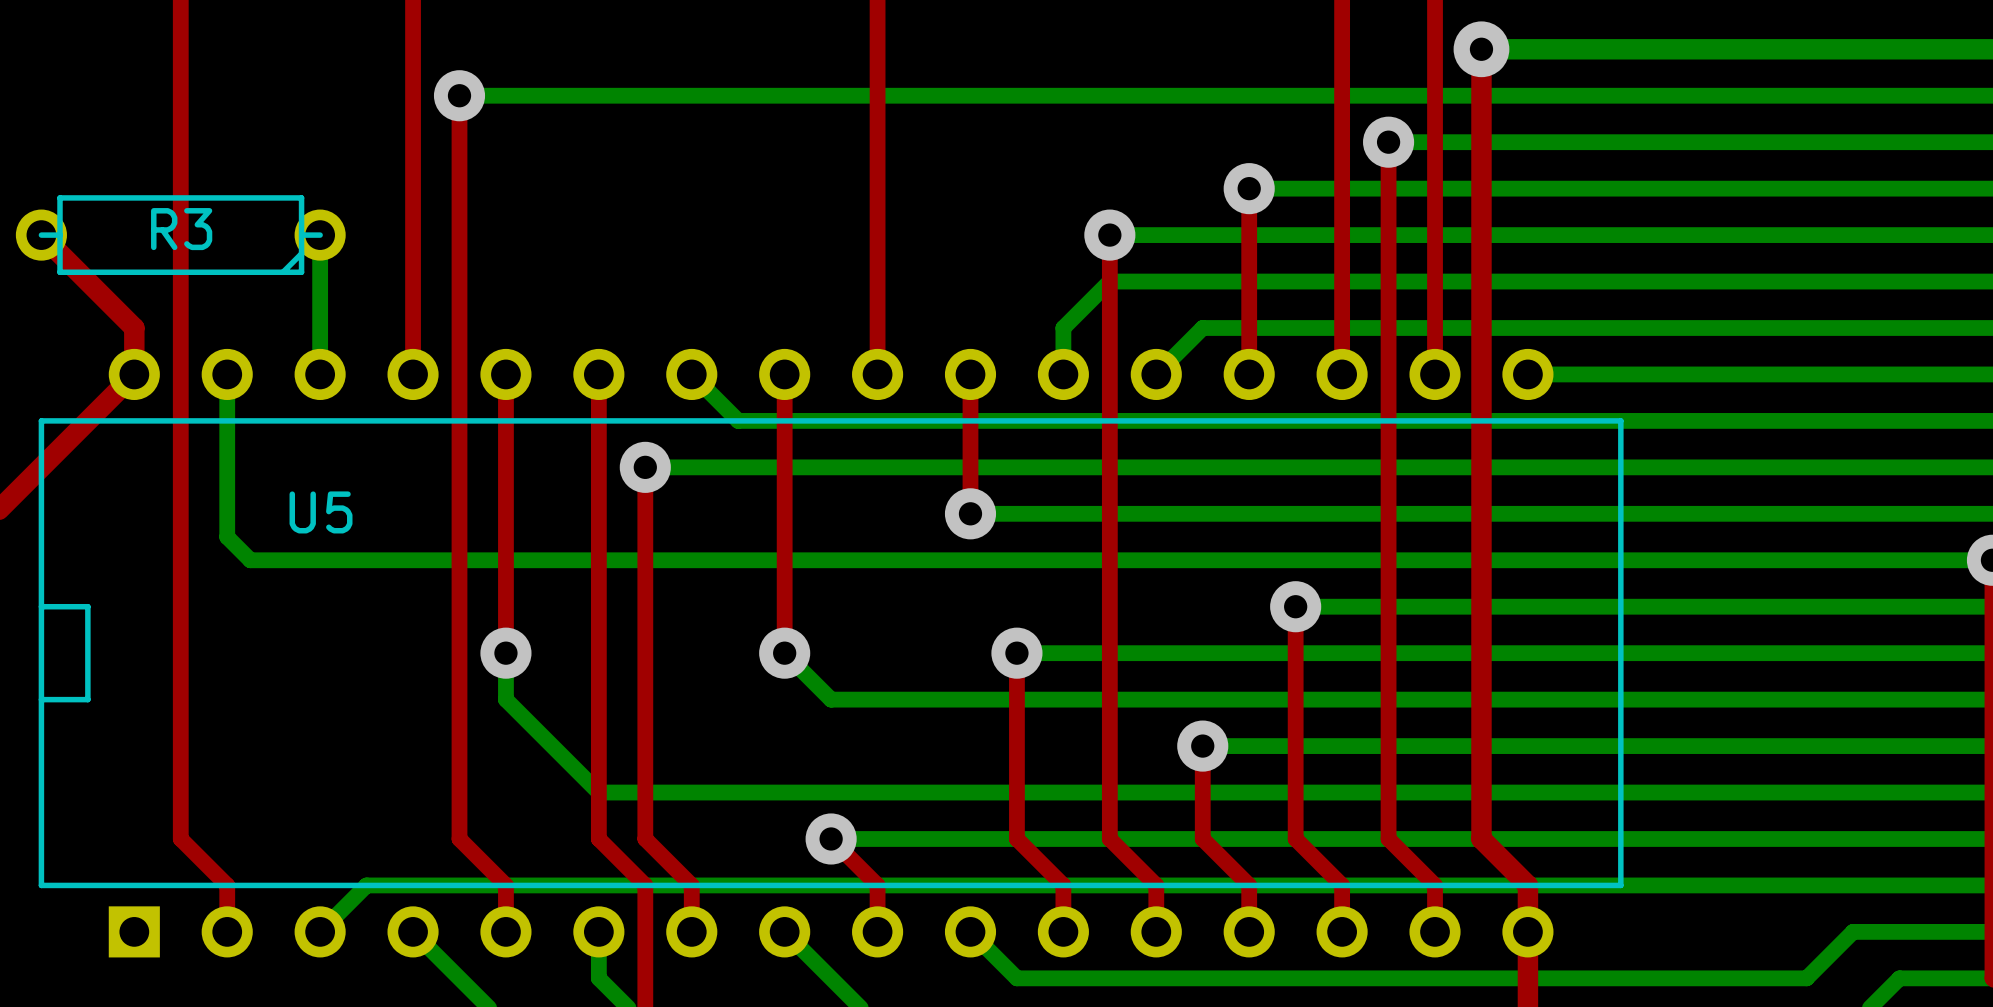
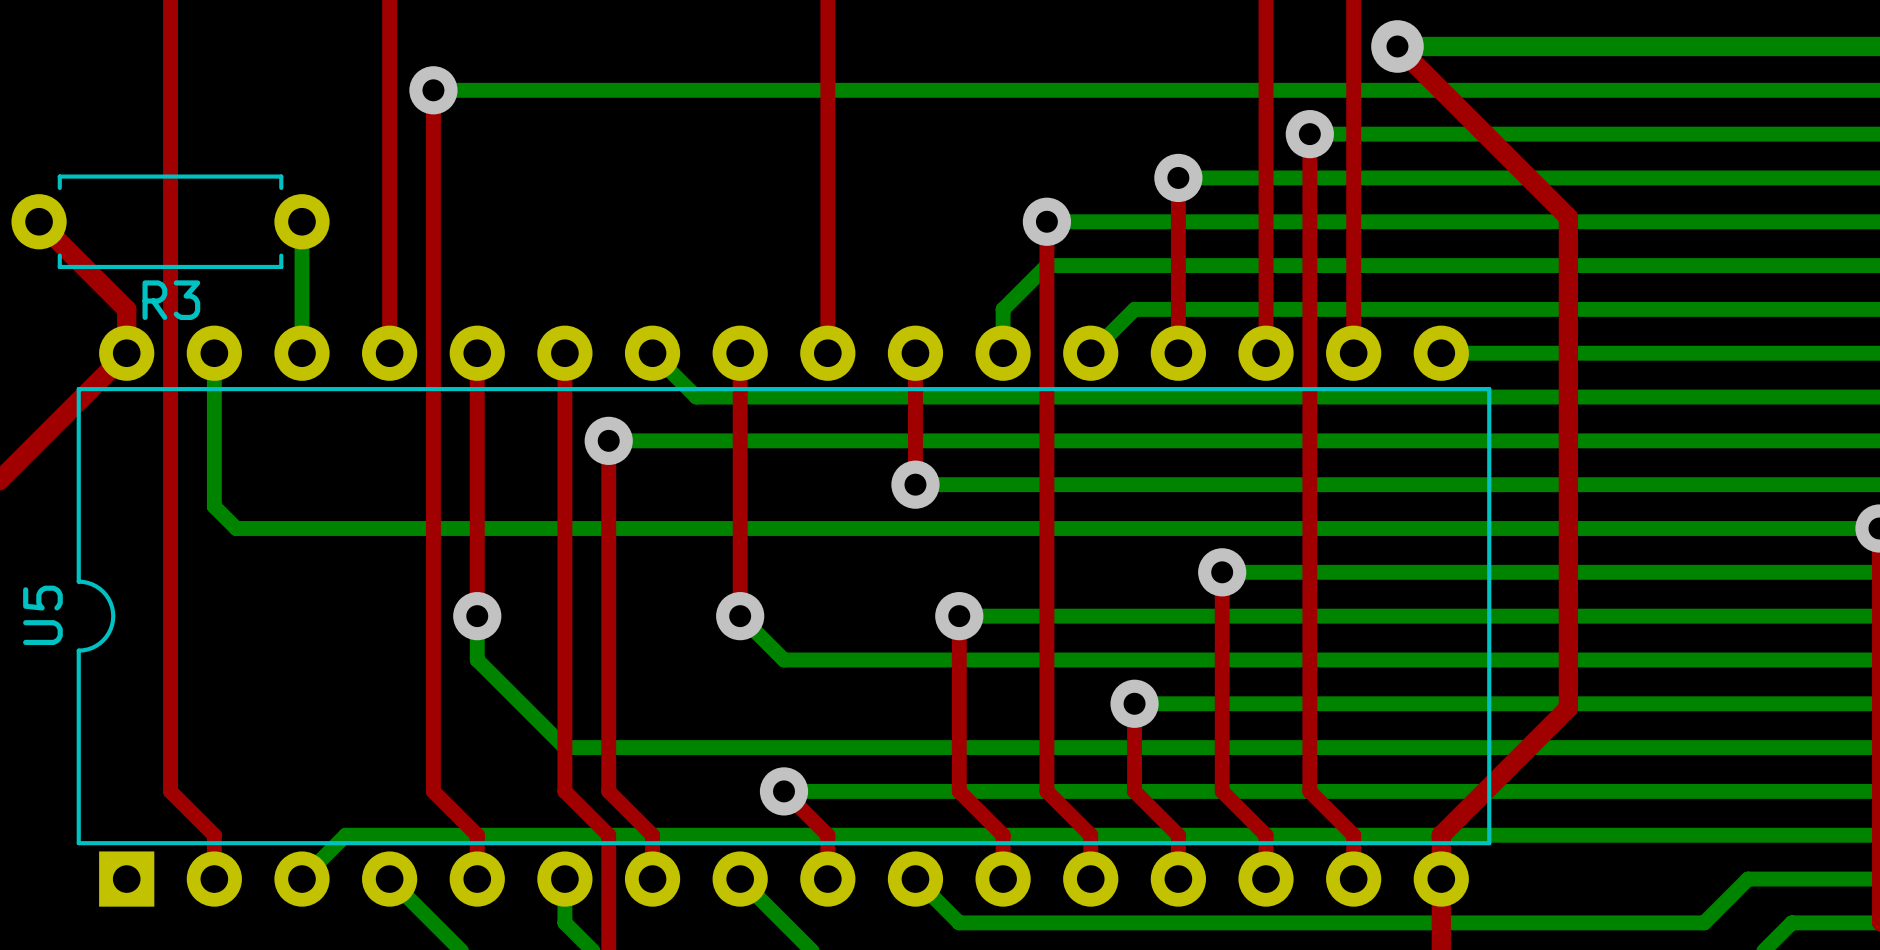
top track: (1481, 49) (1481, 838) (1527, 885) -> (1397, 46) (1568, 217) (1568, 708) (1441, 835)
R3 footprint: [15, 195, 346, 276] -> [11, 174, 330, 270]
R3 name position: R3 (181, 229) -> R3 (171, 300)
U5 footprint: [38, 348, 1624, 958] -> [76, 325, 1492, 907]
U5 name position: U5 (321, 512) -> U5 (42, 615)

